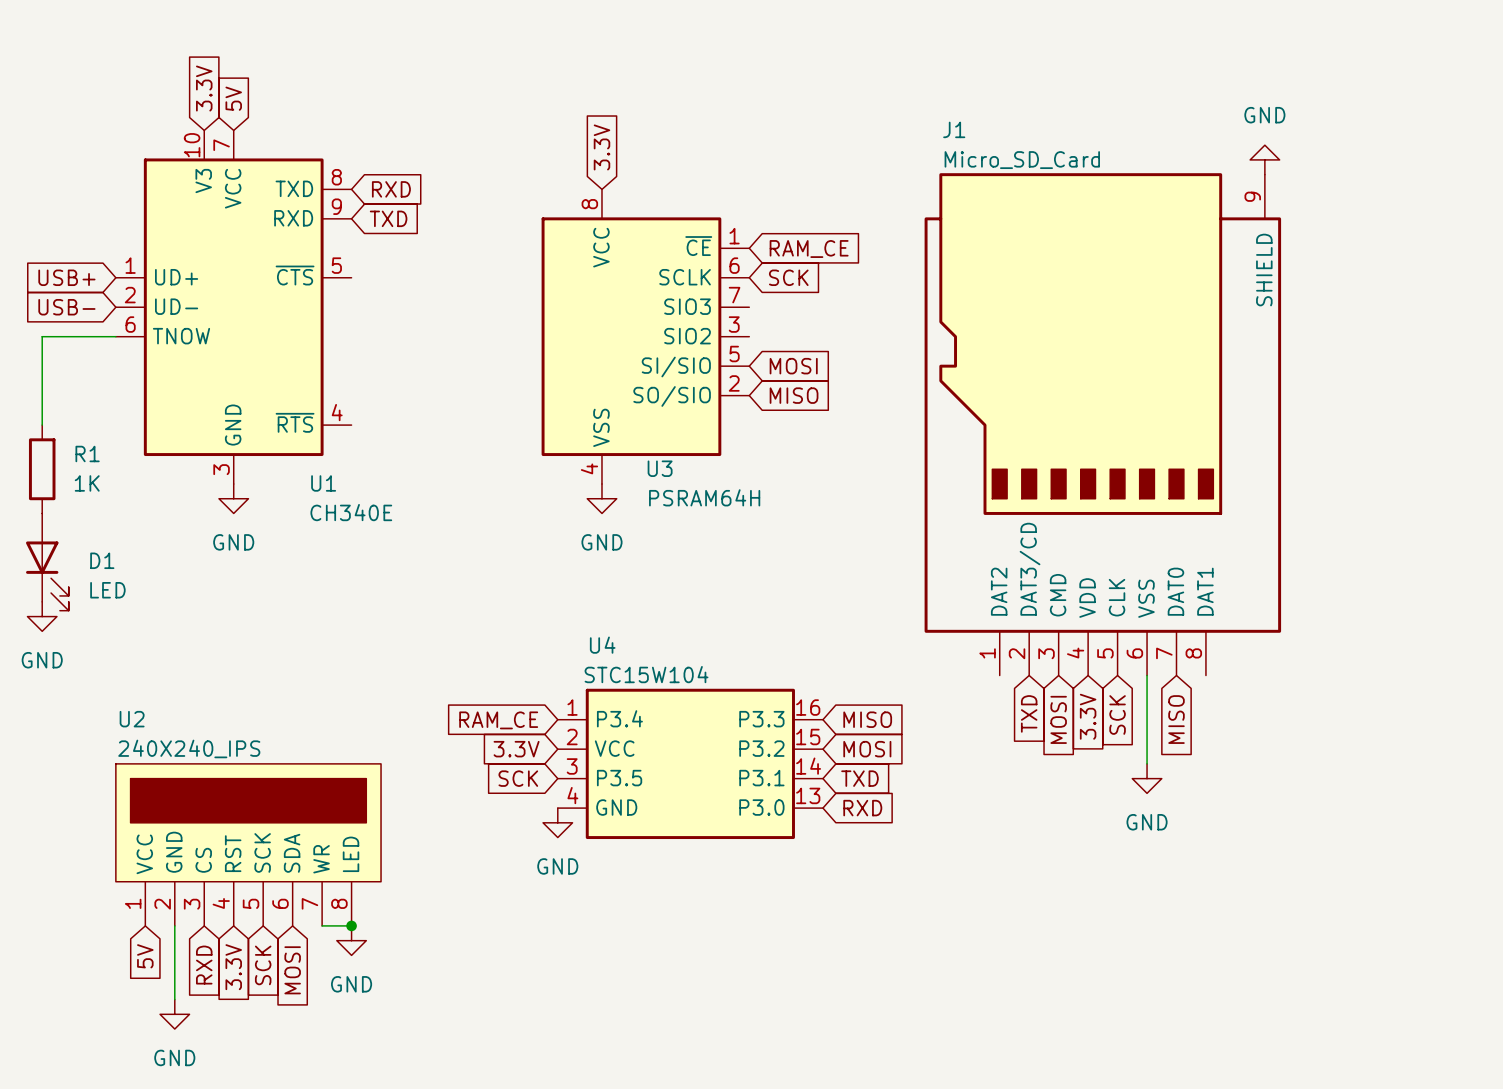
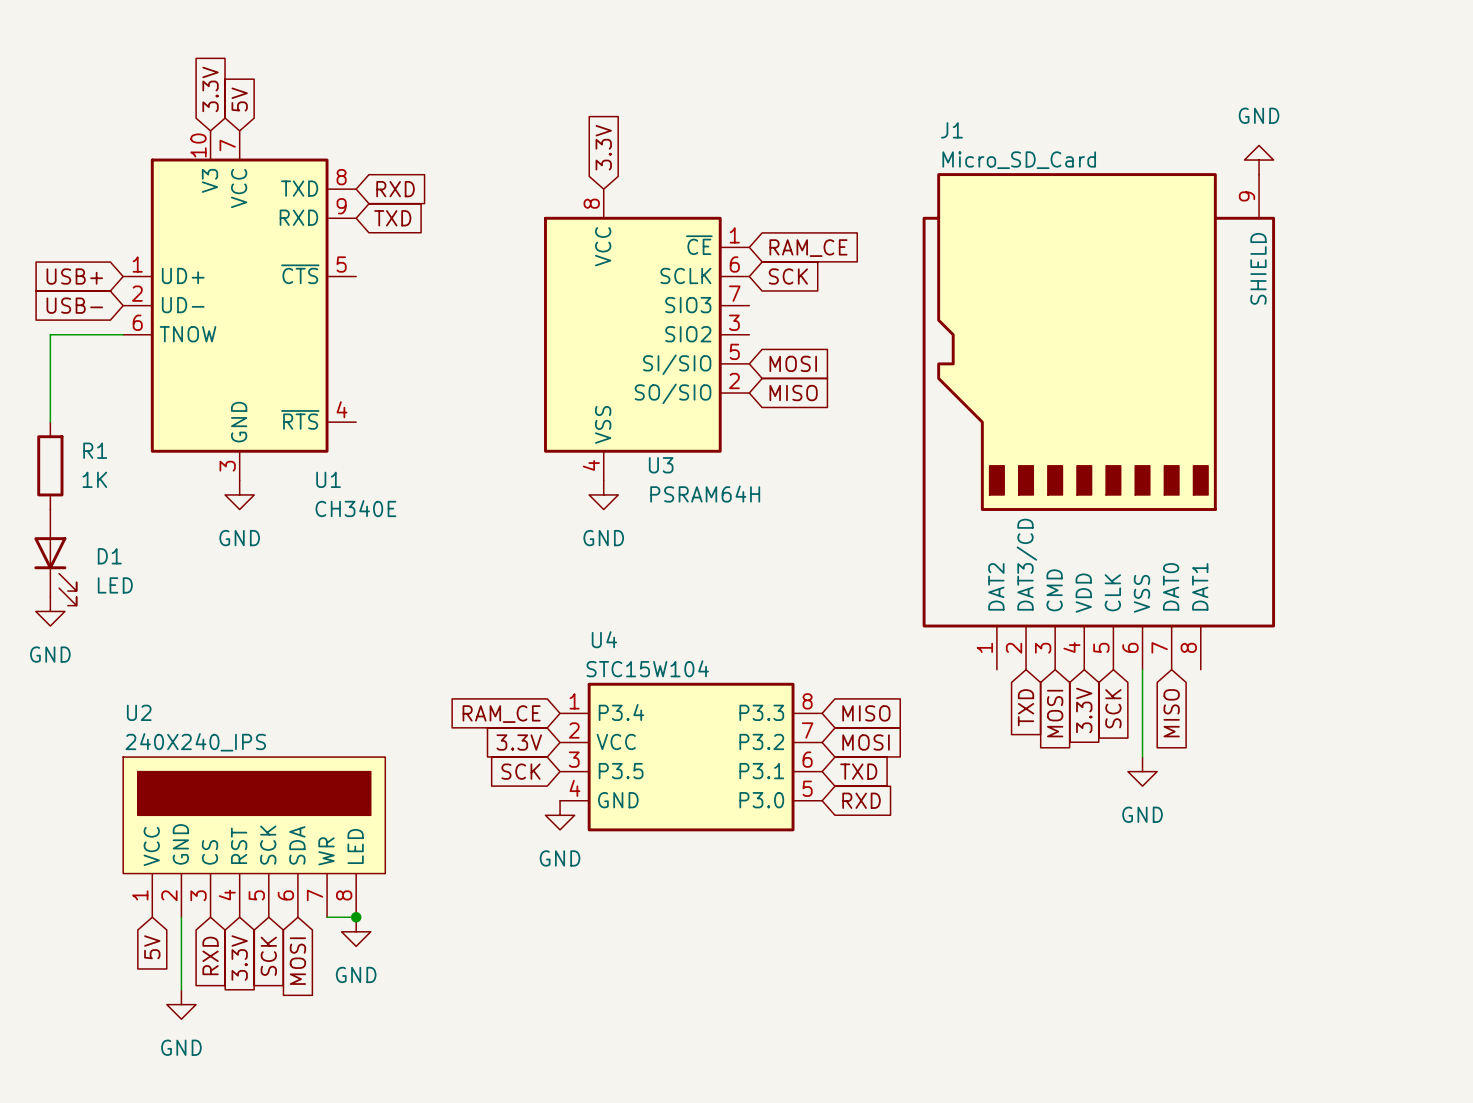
U4 pin number: 16 (808, 707) -> 8 (807, 701)
U4 pin number: 15 (808, 737) -> 7 (807, 730)
U4 pin number: 14 (808, 766) -> 6 (807, 759)
U4 pin number: 13 (808, 795) -> 5 (807, 788)

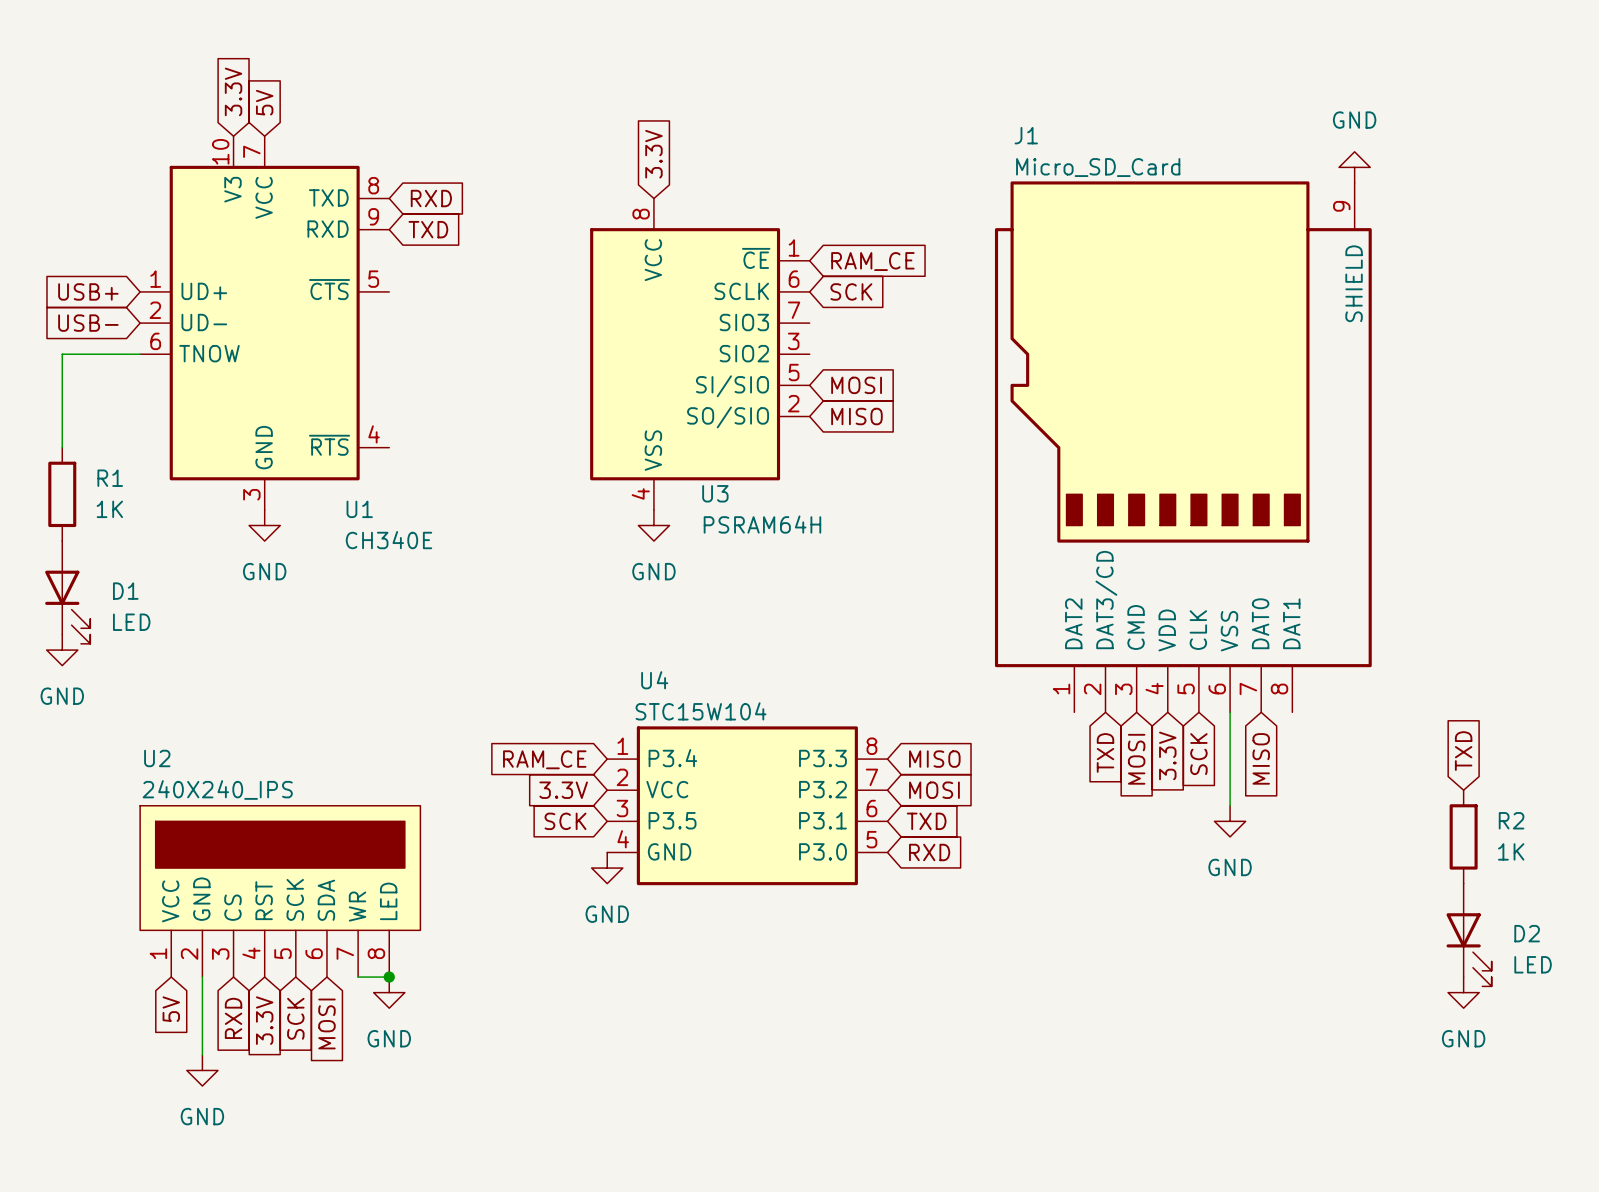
global label: none -> TXD (1463, 751)
R2: none -> 1K (1463, 836)
D2: none -> LED (1469, 935)
power symbol: none -> GND (1463, 992)

